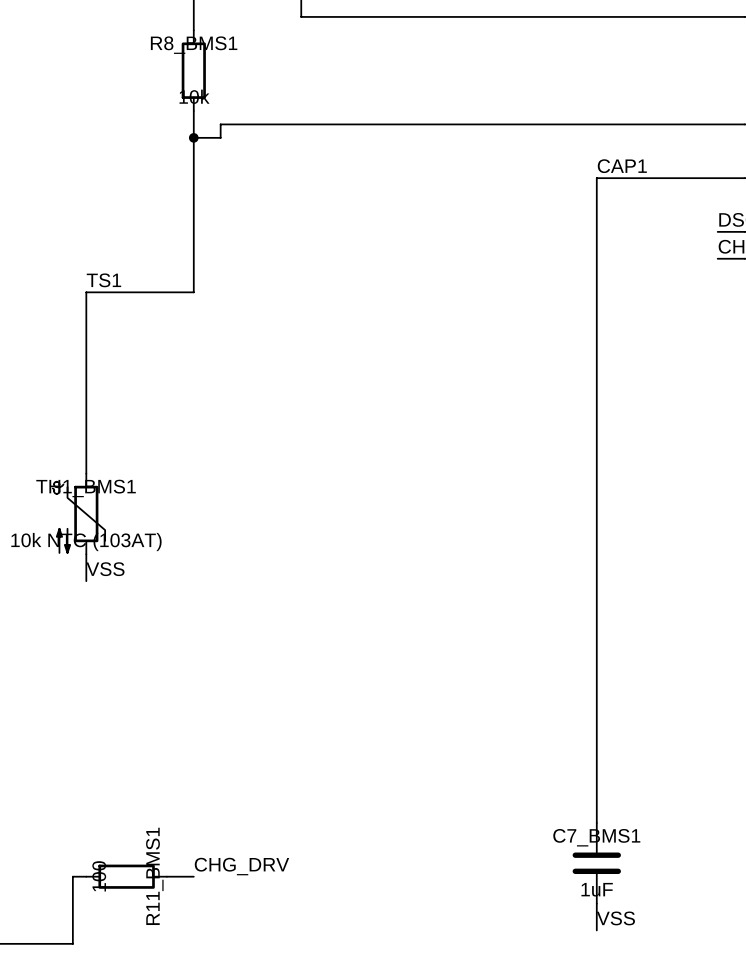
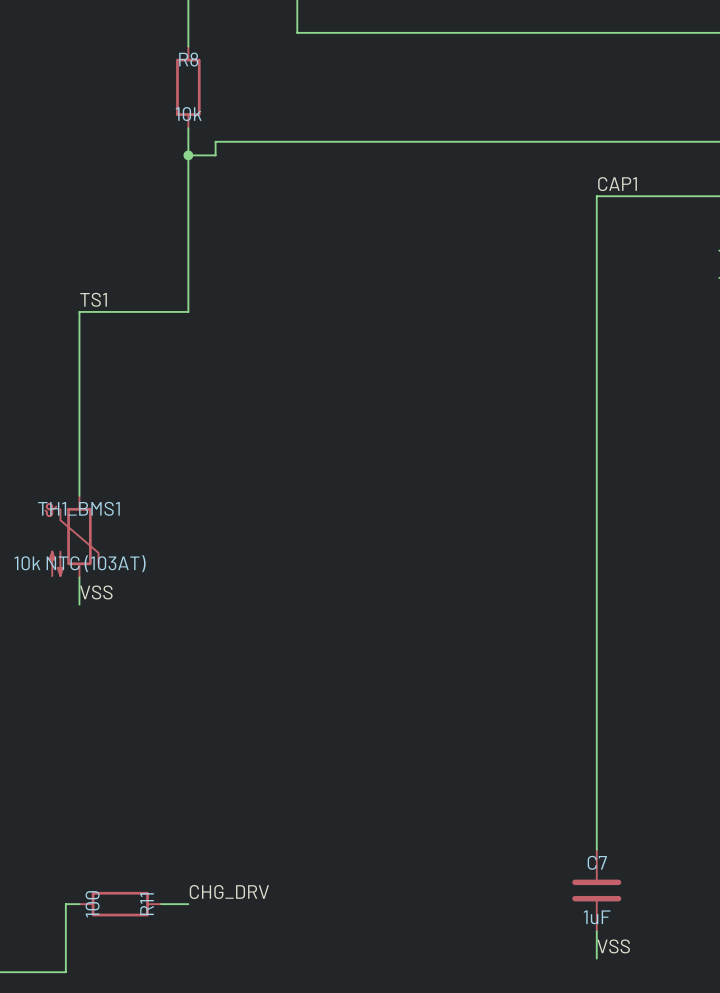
R8_BMS1 name: R8_BMS1 (194, 45) -> R8 (188, 59)
C7_BMS1 name: C7_BMS1 (596, 837) -> C7 (597, 862)
R11_BMS1 name: R11_BMS1 (154, 876) -> R11 (147, 904)

